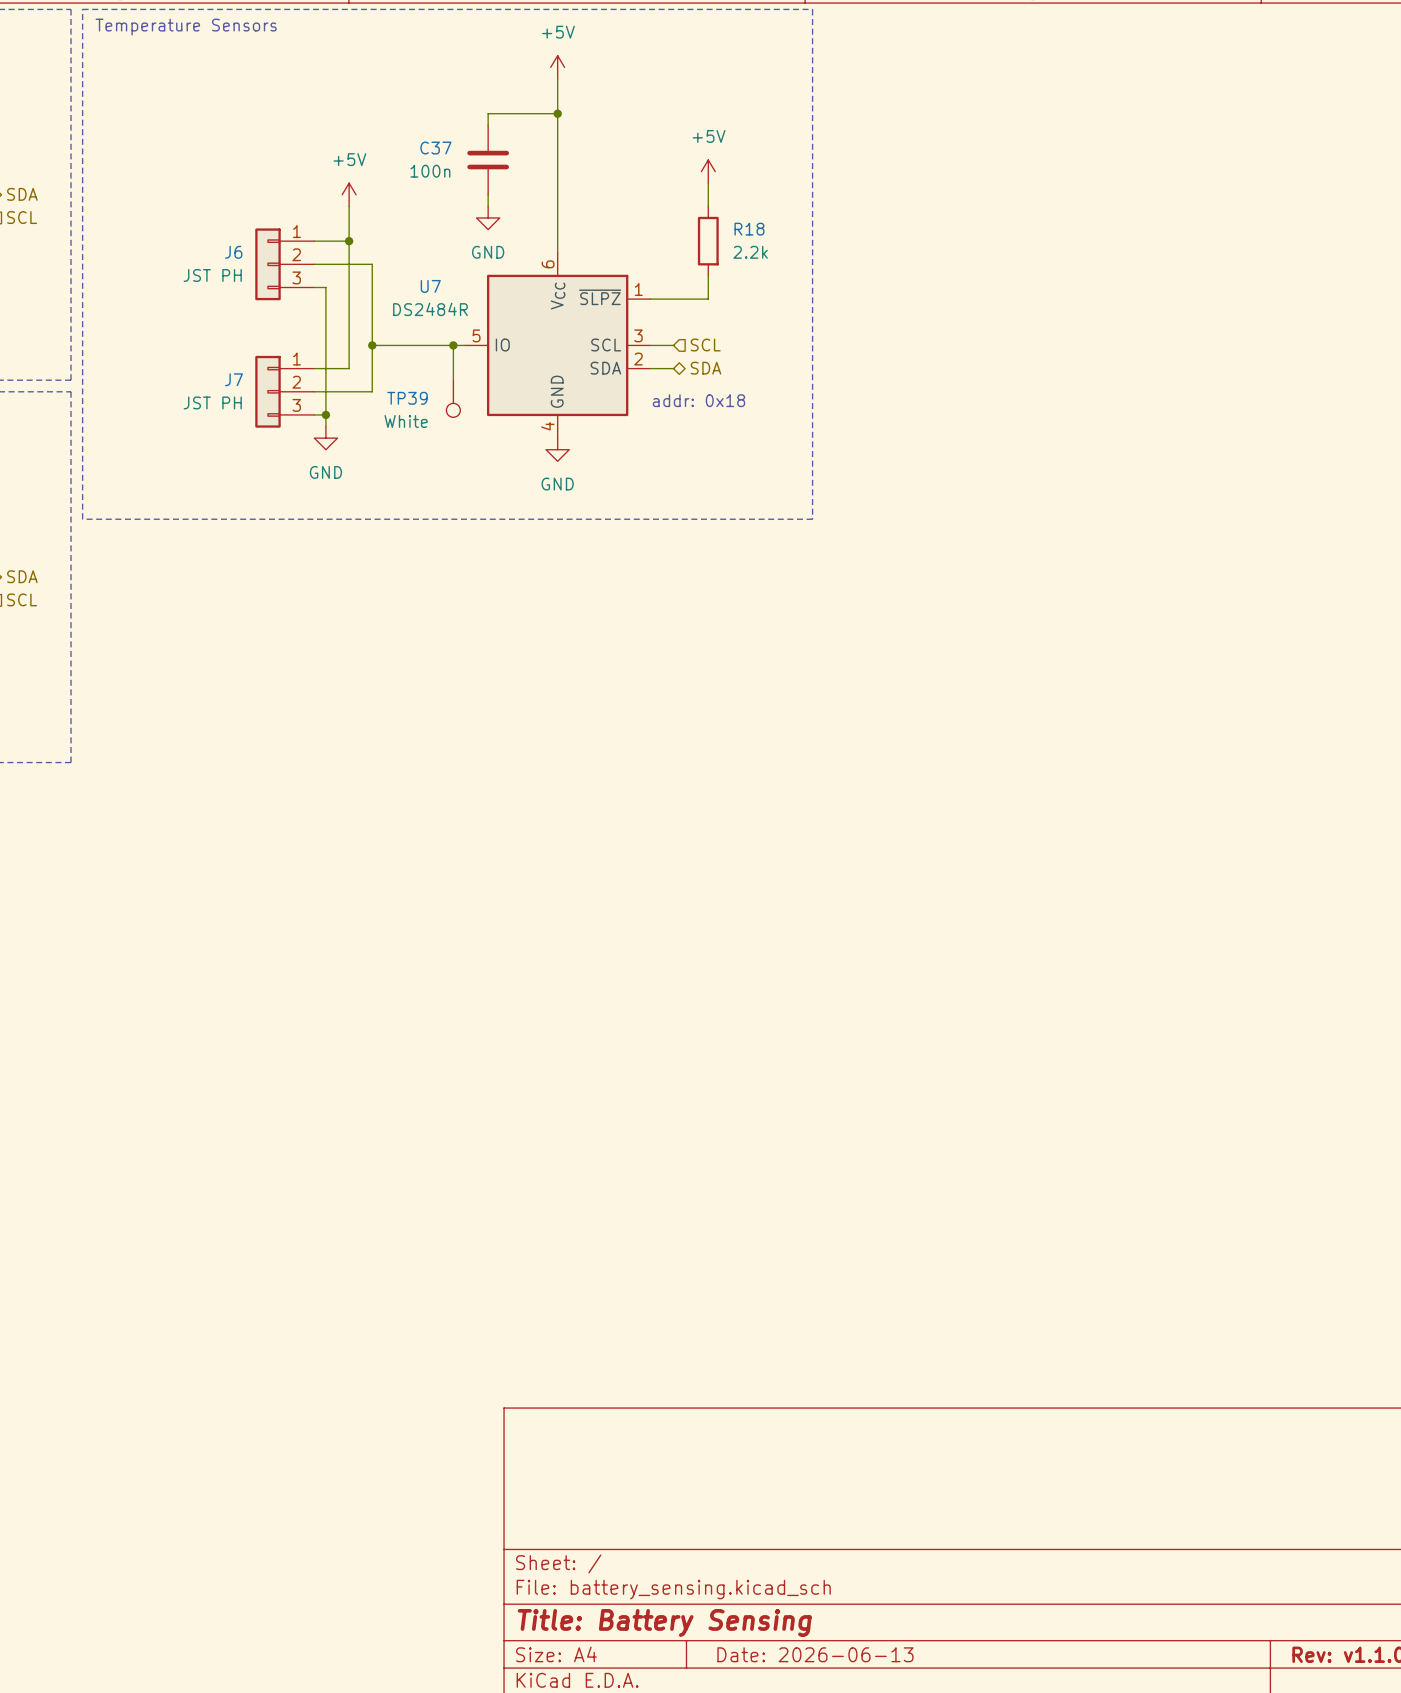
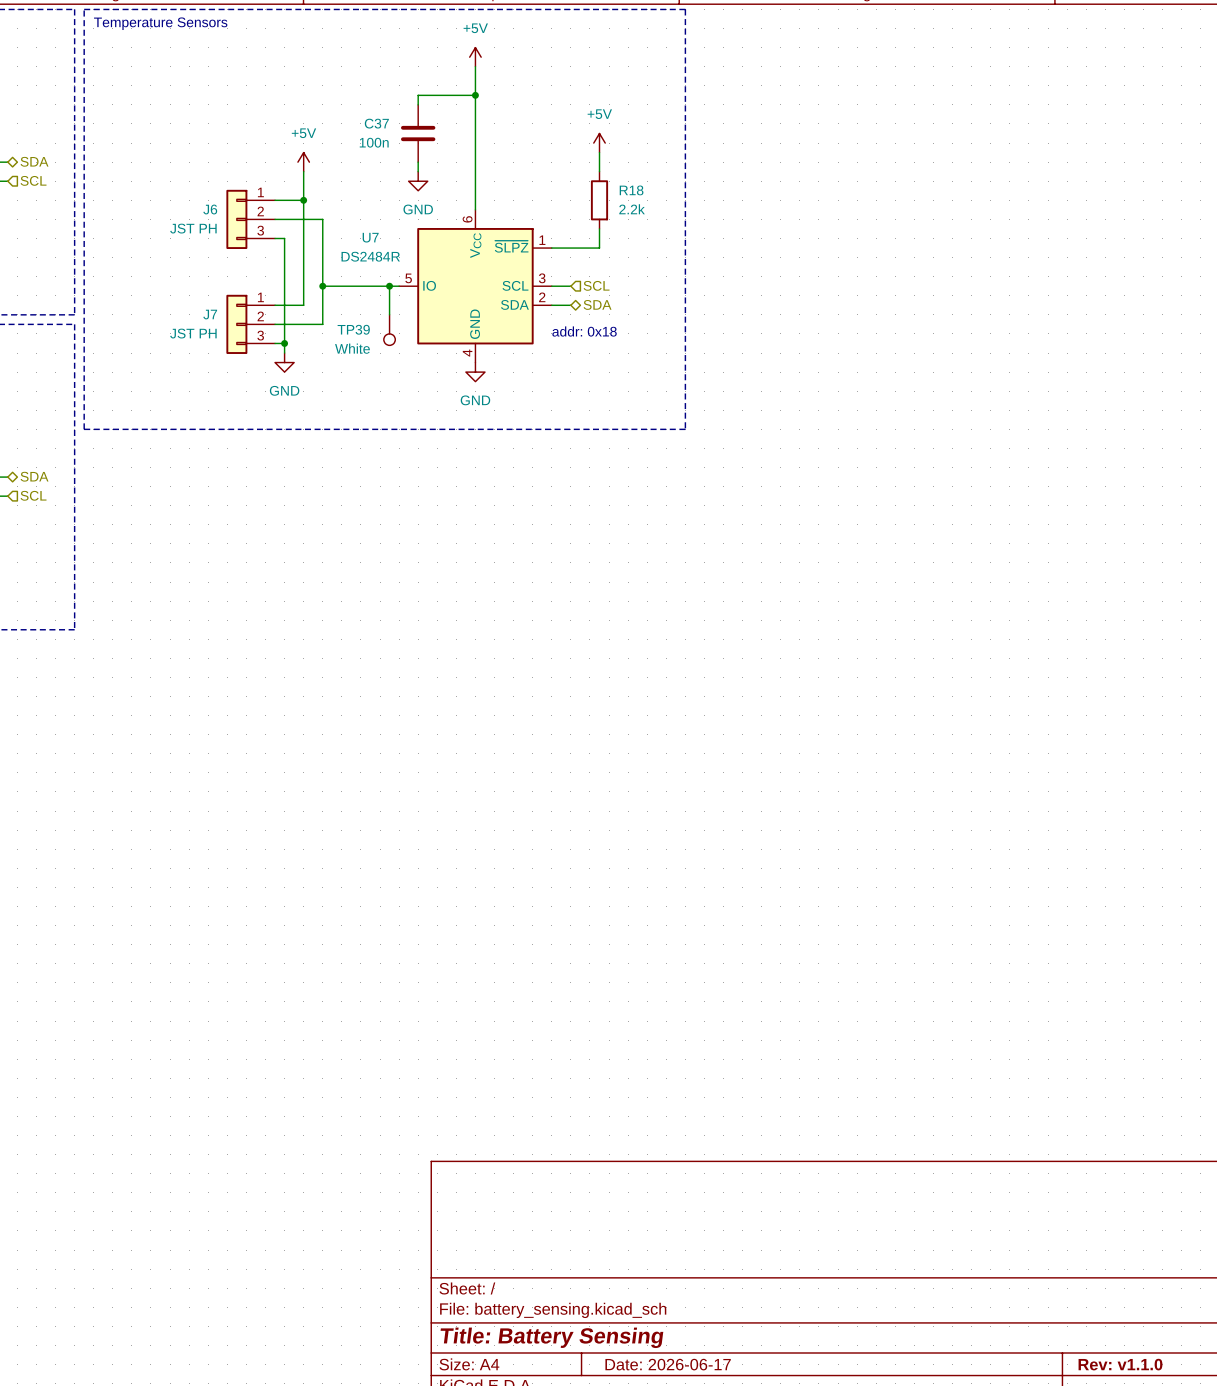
title block: Date: 2026-06-13 (815, 1654) -> Date: 2026-06-17 (668, 1364)

